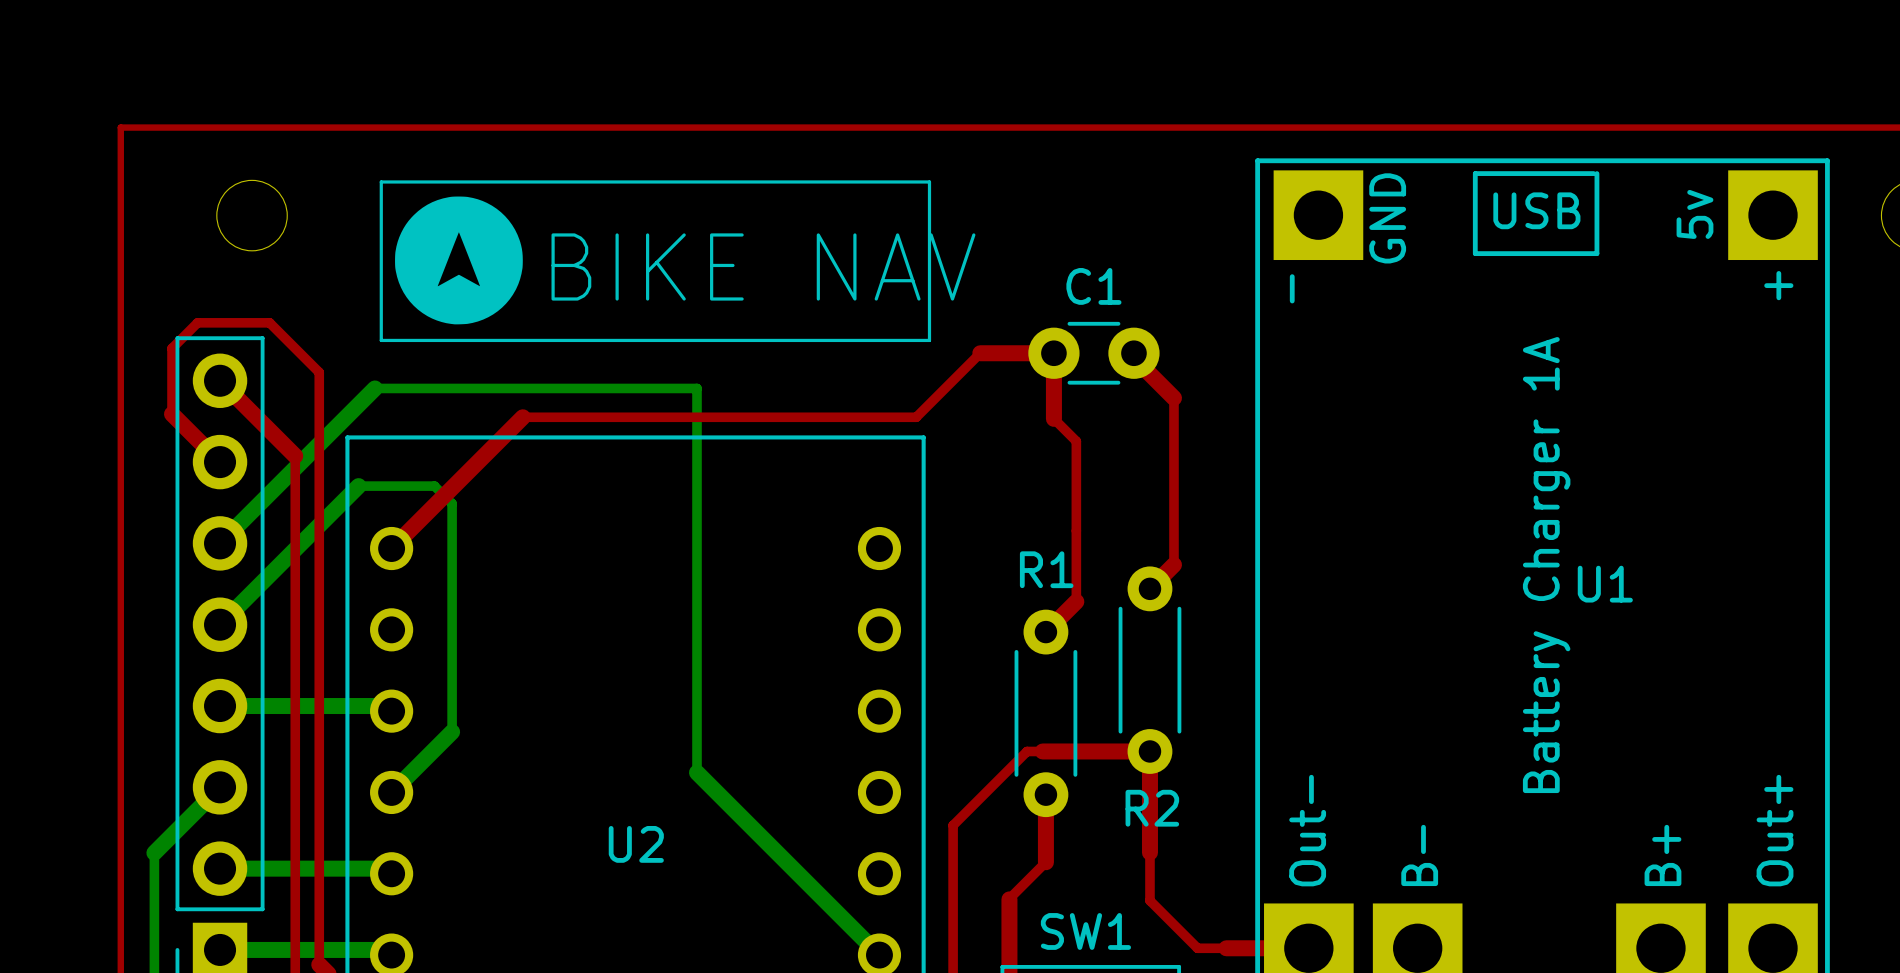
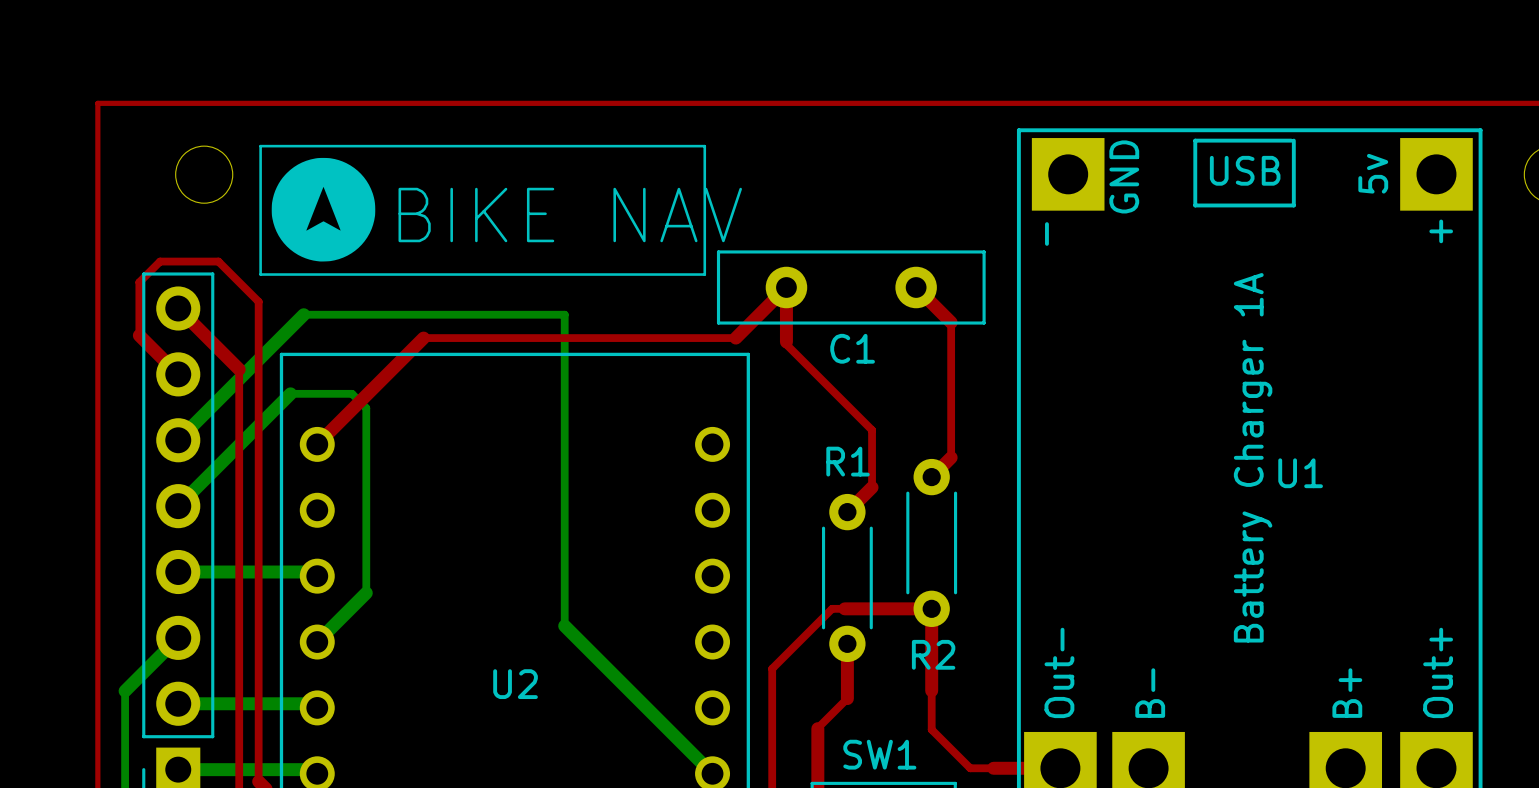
line: (381, 181) (929, 181) (929, 340) (381, 340) (381, 181) -> (260, 146) (704, 146) (704, 274) (260, 274) (260, 146)
drawing position: (458, 260) -> (323, 209)
text position: BIKE NAV (763, 266) -> BIKE NAV (570, 215)
C1 name position: C1 (1093, 286) -> C1 (852, 348)
C1 footprint: [1028, 321, 1160, 385] -> [716, 250, 986, 325]
top track: (908, 417) (916, 417) (980, 353) (1053, 353) (1053, 418) (1076, 441) (1076, 530) -> (735, 338) (786, 287) (786, 344) (872, 430)

